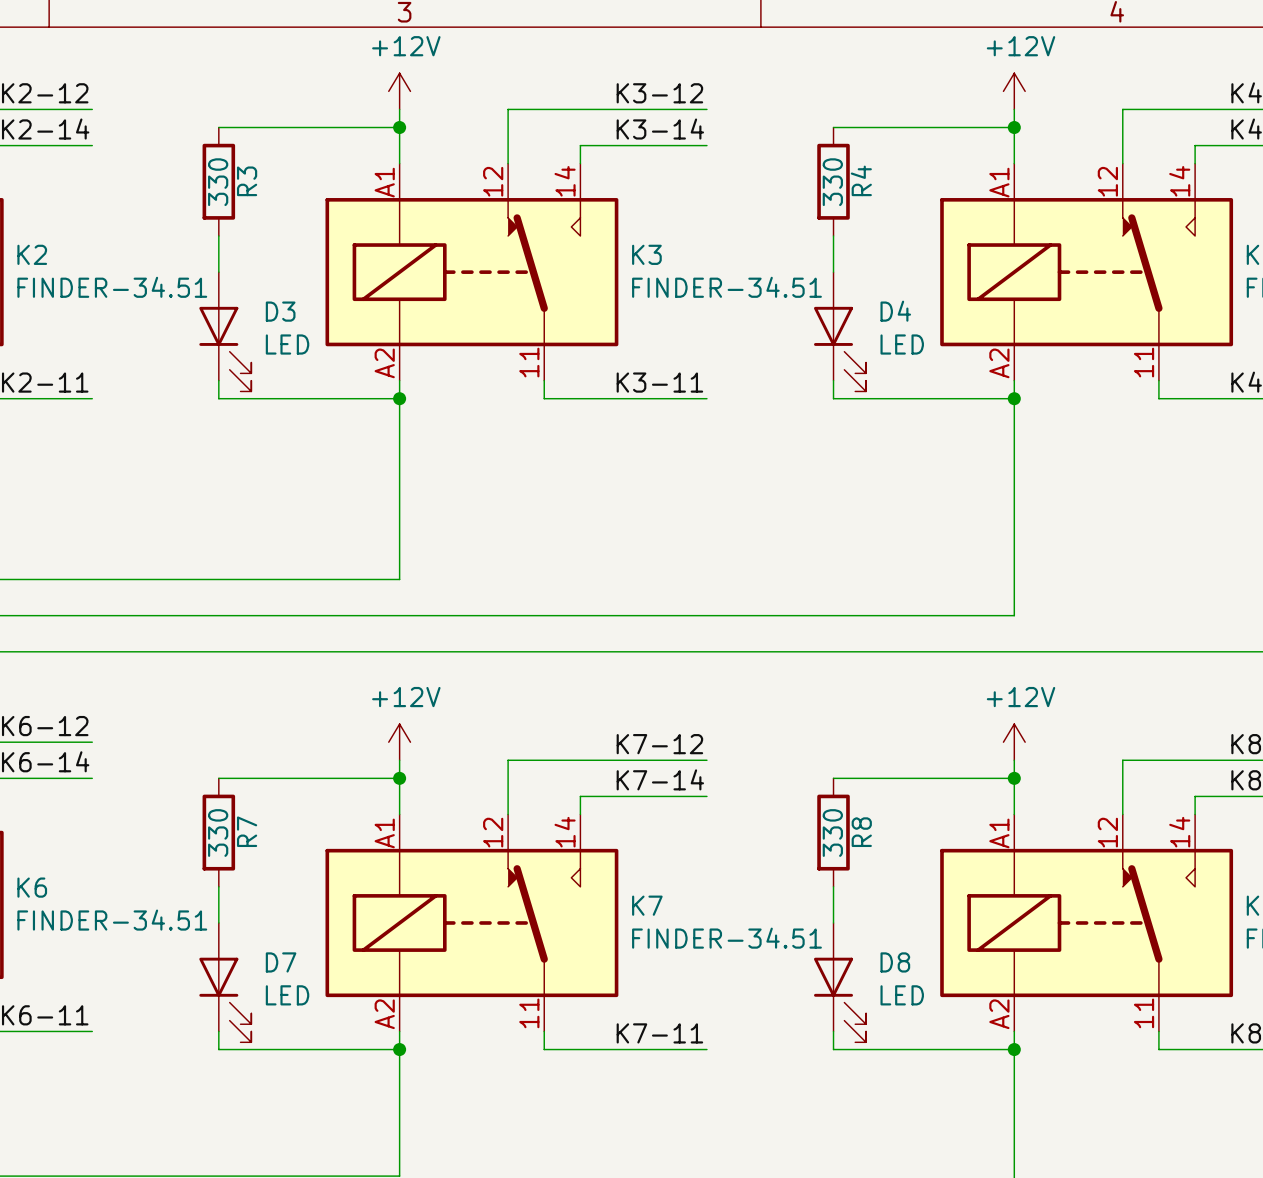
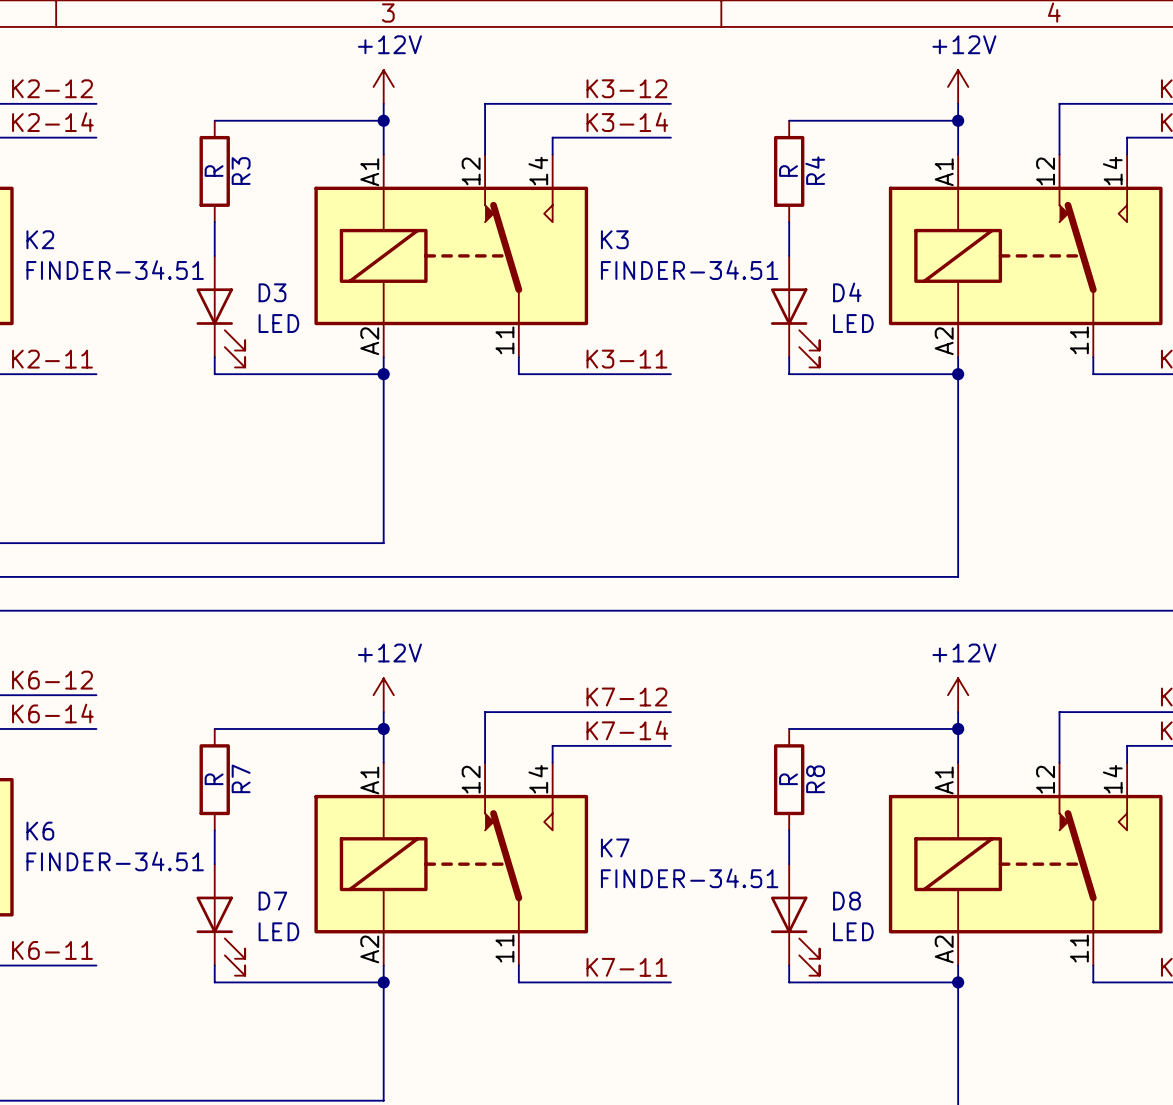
R3 value: 330 (218, 182) -> R (214, 171)
R4 value: 330 (832, 182) -> R (788, 171)
R7 value: 330 (218, 833) -> R (214, 779)
R8 value: 330 (832, 833) -> R (788, 779)

